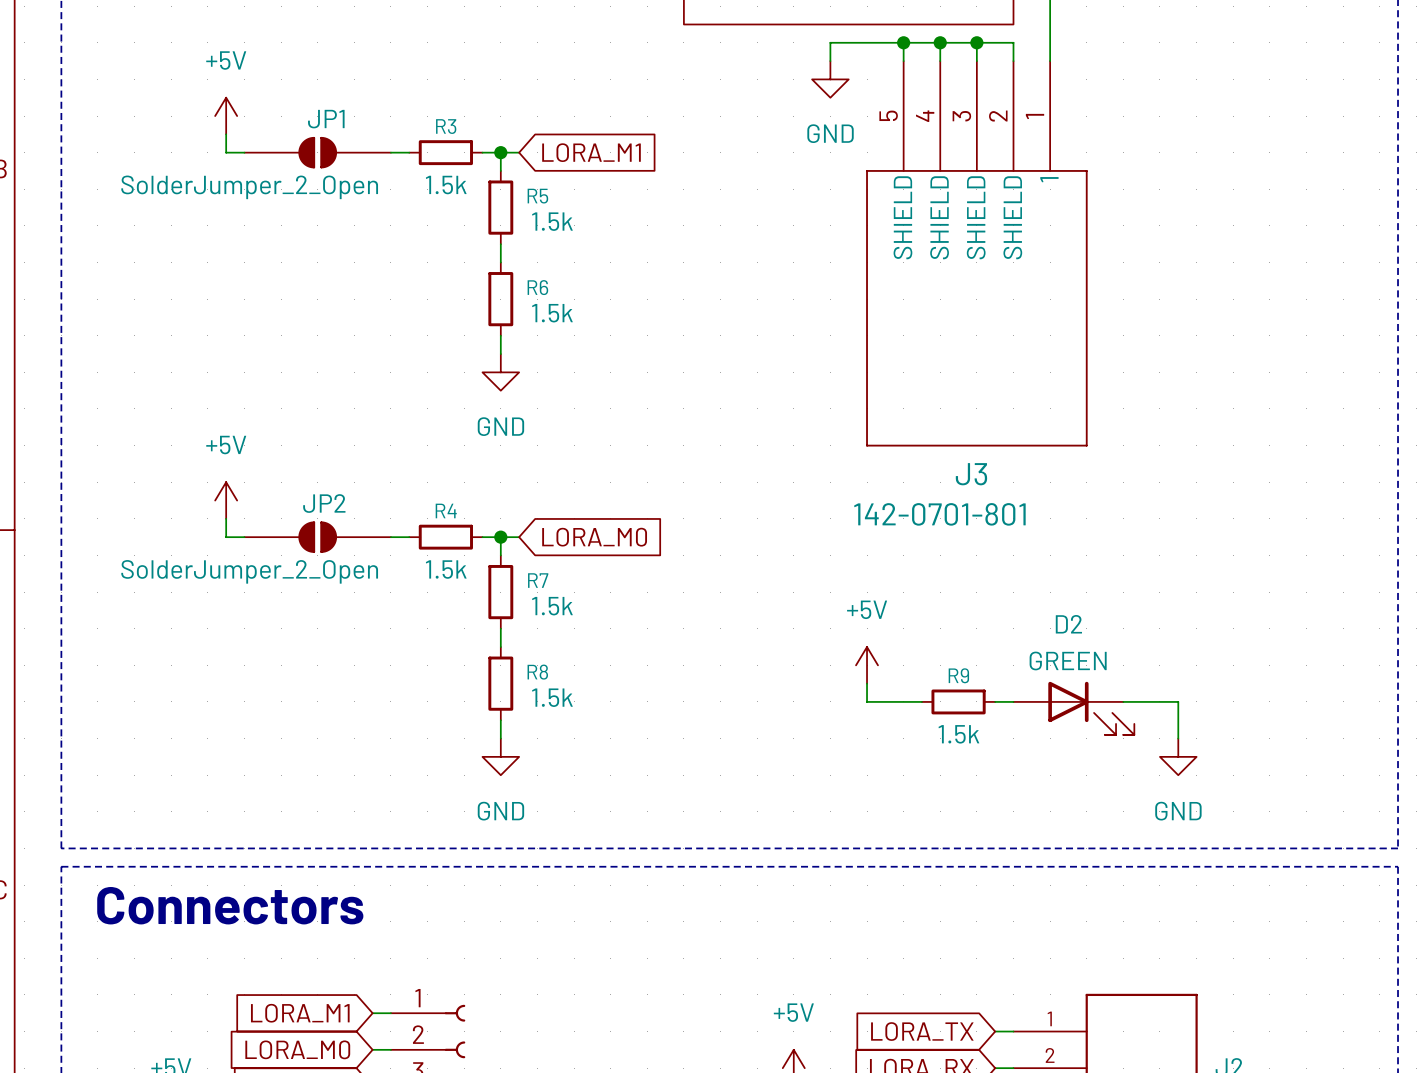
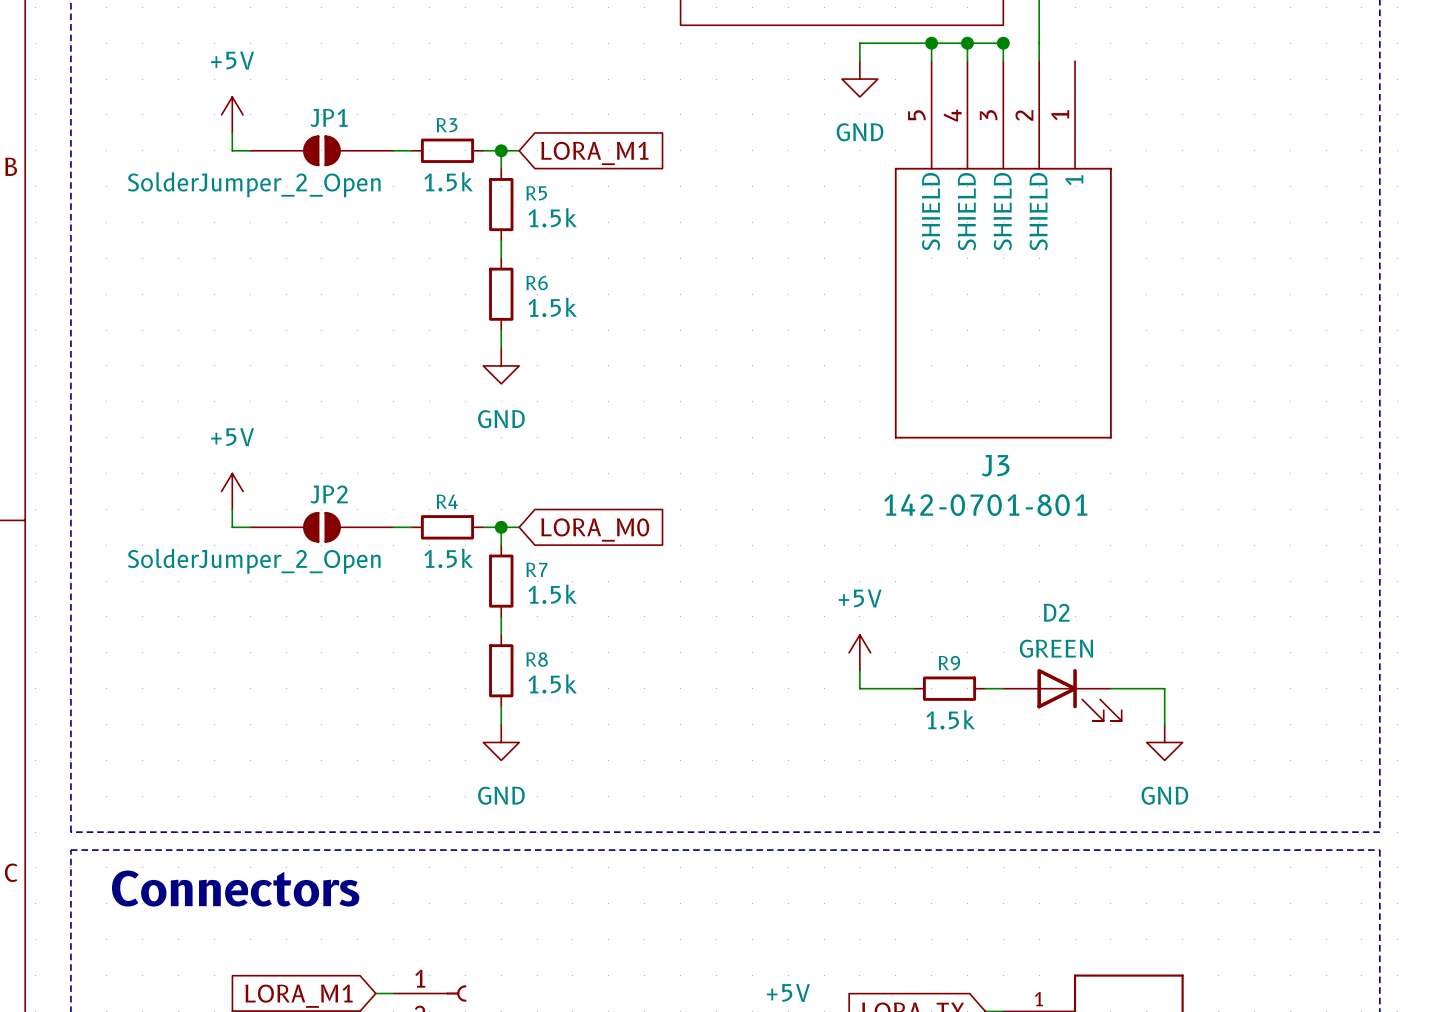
wire: (867, 42) (830, 42) (830, 61) -> (859, 43) (859, 61)
wire: (903, 42) (903, 61) -> none
junction: (903, 42) -> none
junction: none -> (1003, 43)
power symbol position: GND (830, 79) -> GND (859, 79)
J3 position: (976, 253) -> (1003, 249)

